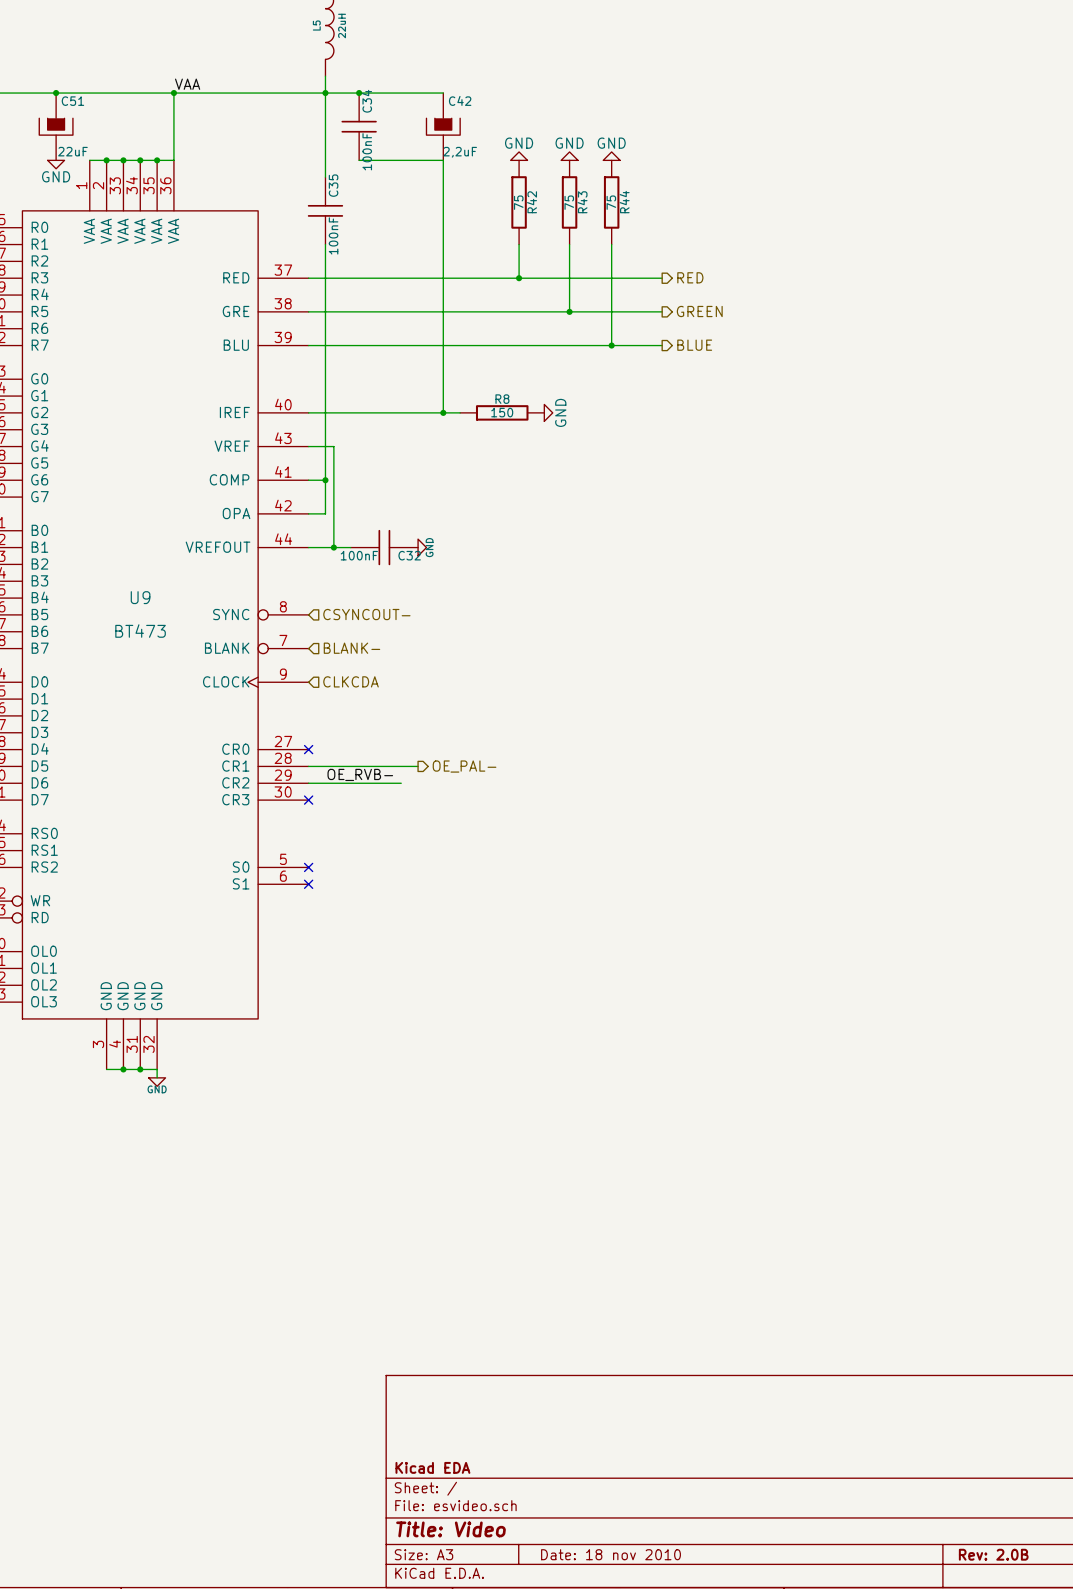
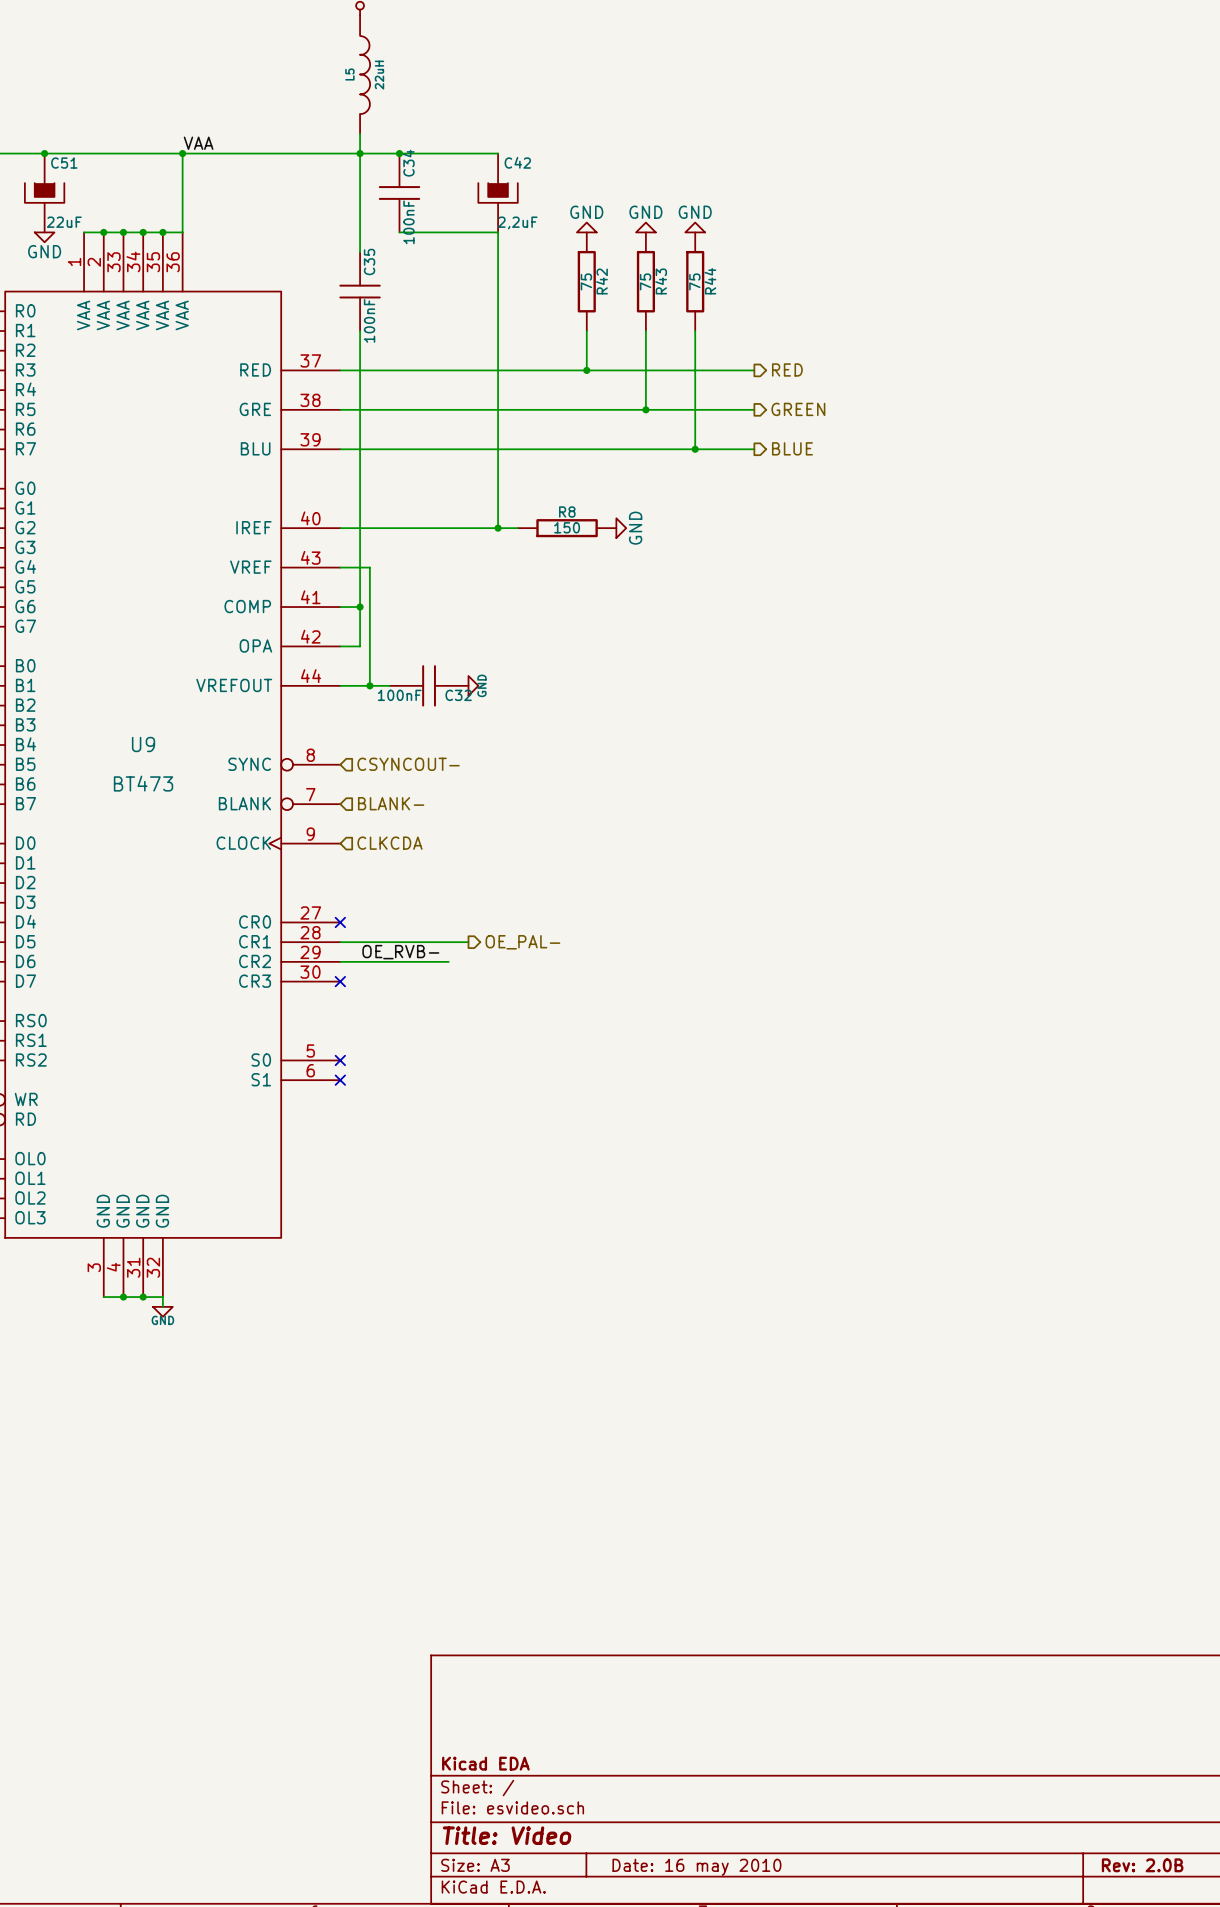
title block: Date: 18 nov 2010 (611, 1554) -> Date: 16 may 2010 (696, 1867)

